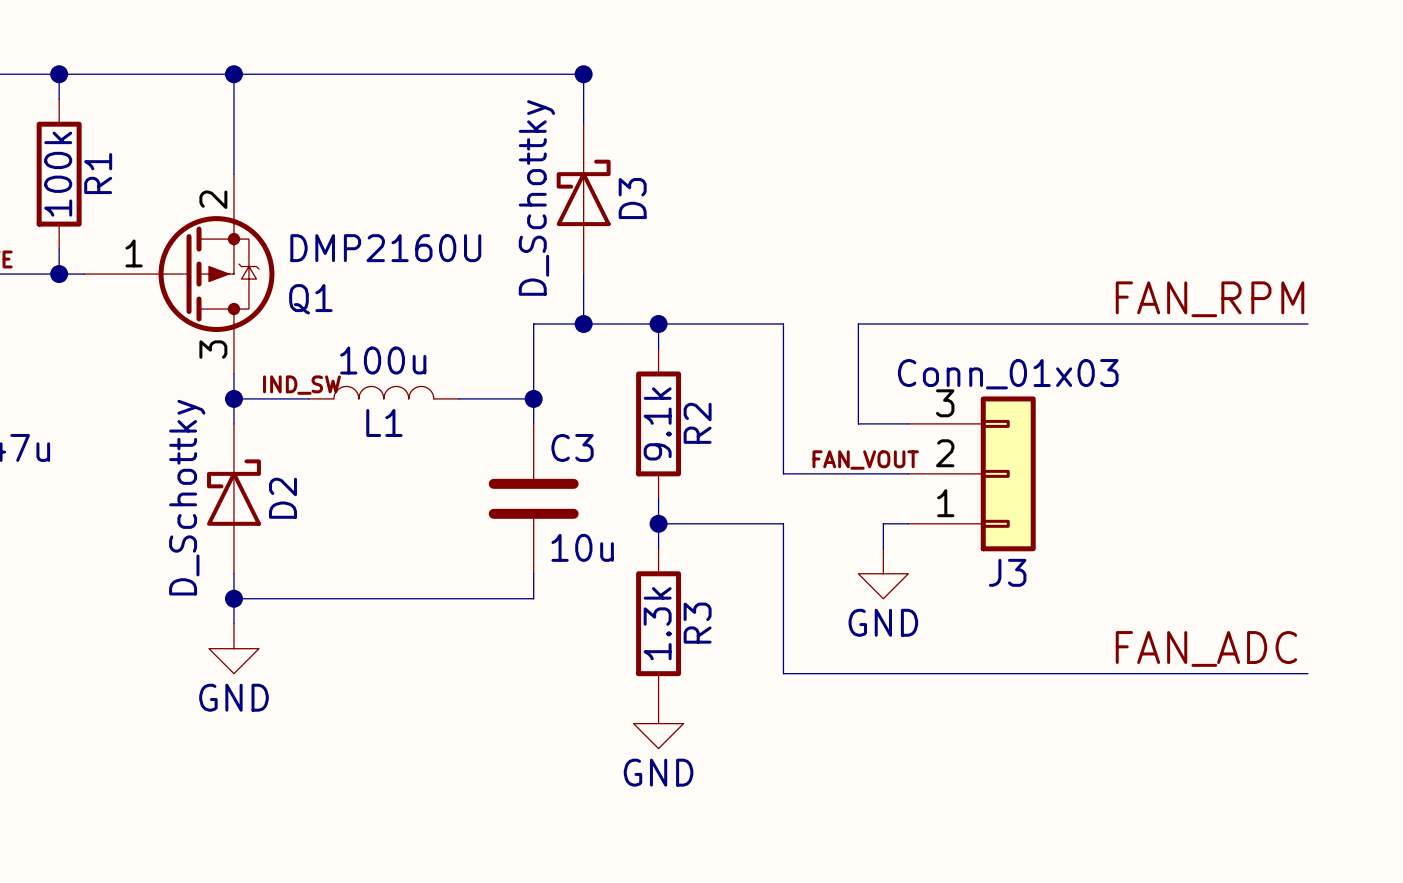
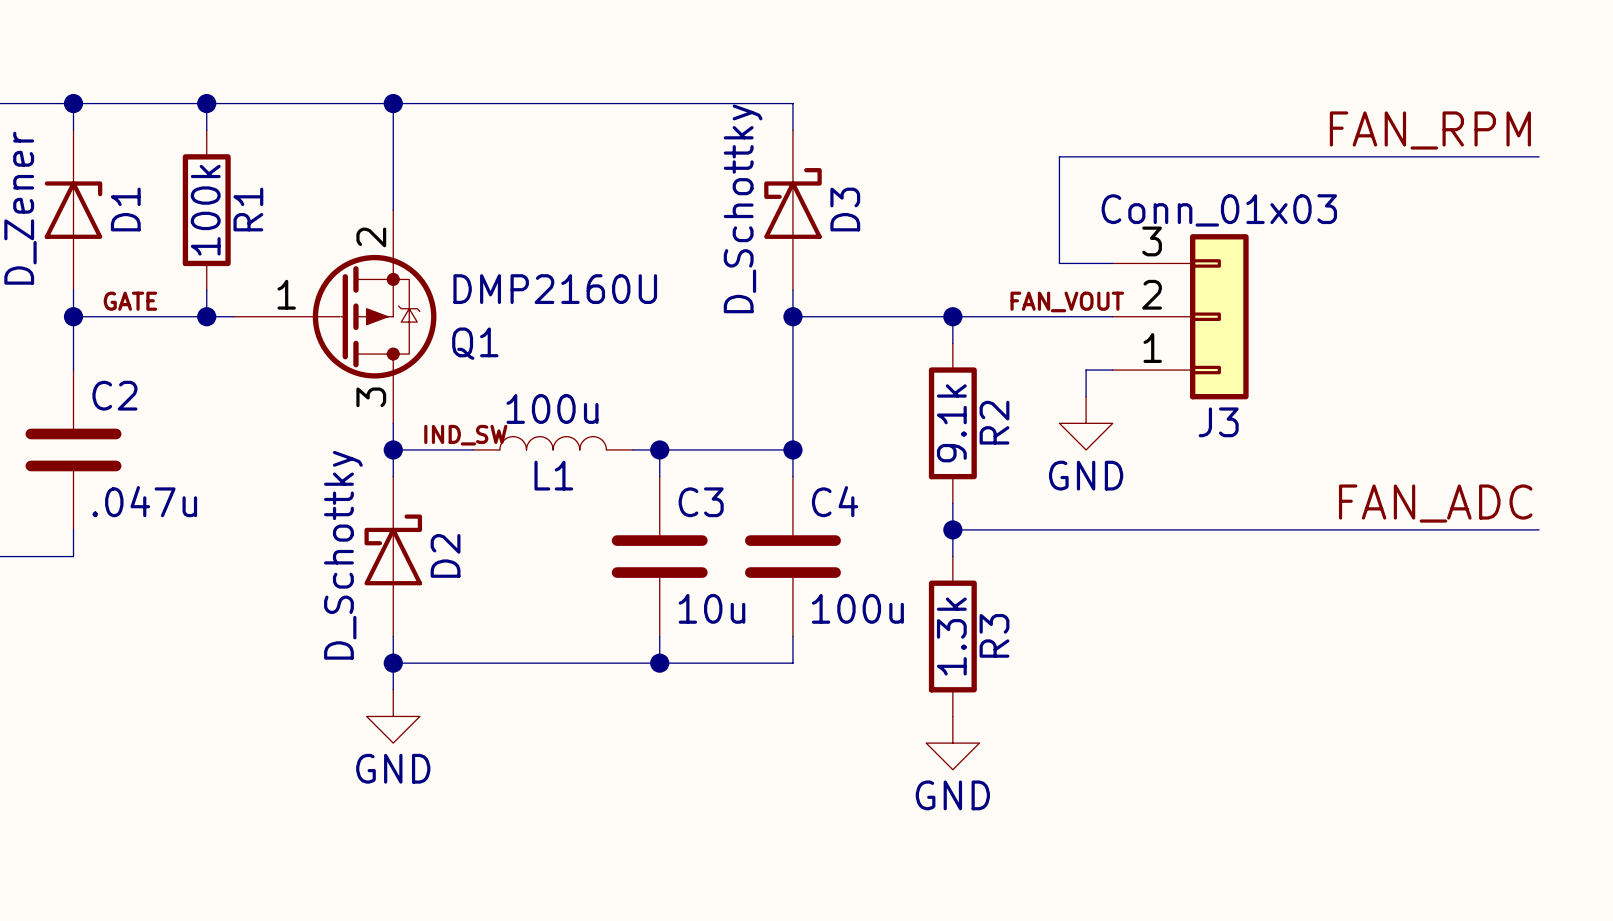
wire: (583, 74) (583, 124) -> (766, 103) (792, 103) (792, 130)
junction: (583, 74) -> none
wire: none -> (1539, 156) (1059, 156) (1059, 263) (1112, 263)
D3 position: (583, 199) -> (792, 210)
wire: none -> (792, 290) (792, 476)
wire: (583, 274) (583, 324) -> none
wire: none -> (792, 316) (1112, 316)
junction: none -> (792, 316)
junction: none -> (952, 316)
label position: FAN_RPM (1210, 299) -> FAN_RPM (1430, 130)
junction: (583, 324) -> none
wire: (658, 324) (658, 348) -> (952, 316) (952, 343)
junction: (658, 324) -> none
wire: (883, 324) (858, 324) (858, 423) (908, 423) -> (1086, 370) (1086, 396)
wire: (908, 324) (1307, 324) -> (1112, 529) (1539, 529)
power symbol: none -> GND (1086, 423)
wire: none -> (659, 449) (659, 476)
junction: none -> (659, 449)
wire: none -> (713, 449) (792, 449)
junction: (533, 398) -> none
junction: none -> (792, 449)
wire: (533, 423) (533, 324) (783, 324) (783, 473) -> (952, 529) (979, 529)
R2 position: (658, 423) -> (952, 423)
label position: FAN_VOUT (865, 460) -> FAN_VOUT (1067, 301)
junction: none -> (952, 529)
J3 position: (972, 473) -> (1180, 316)
C3 position: (533, 498) -> (659, 556)
C4: none -> 100u (792, 556)
wire: (658, 498) (658, 548) -> (952, 503) (952, 556)
wire: (658, 523) (783, 523) (783, 673) (1307, 673) -> none
junction: (658, 523) -> none
wire: (908, 523) (883, 523) (883, 548) -> none
wire: none -> (659, 636) (659, 663)
wire: (533, 573) (533, 598) -> (792, 636) (792, 663) (713, 663)
power symbol: GND (883, 573) -> none
junction: none -> (659, 663)
R3 position: (658, 623) -> (952, 636)
label position: FAN_ADC (1206, 648) -> FAN_ADC (1435, 503)
power symbol: none -> GND (952, 743)
power symbol: GND (658, 723) -> none

